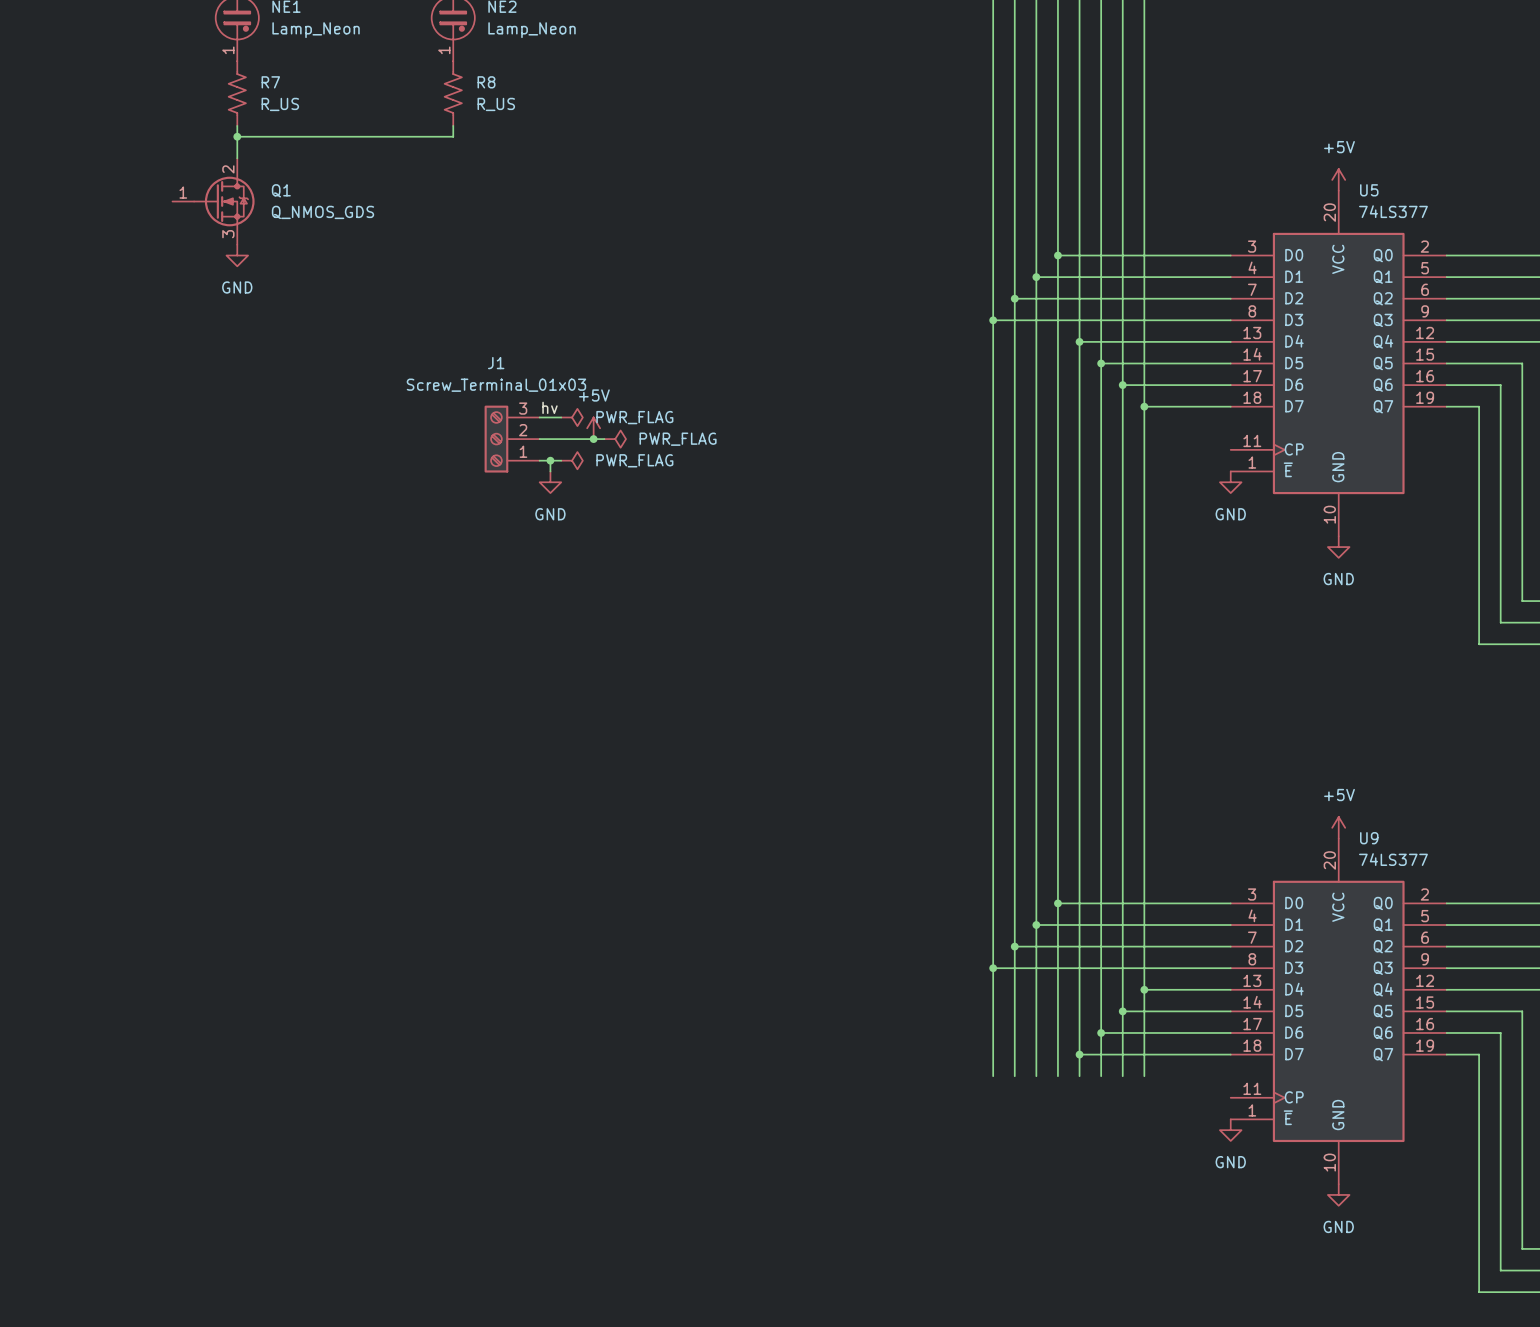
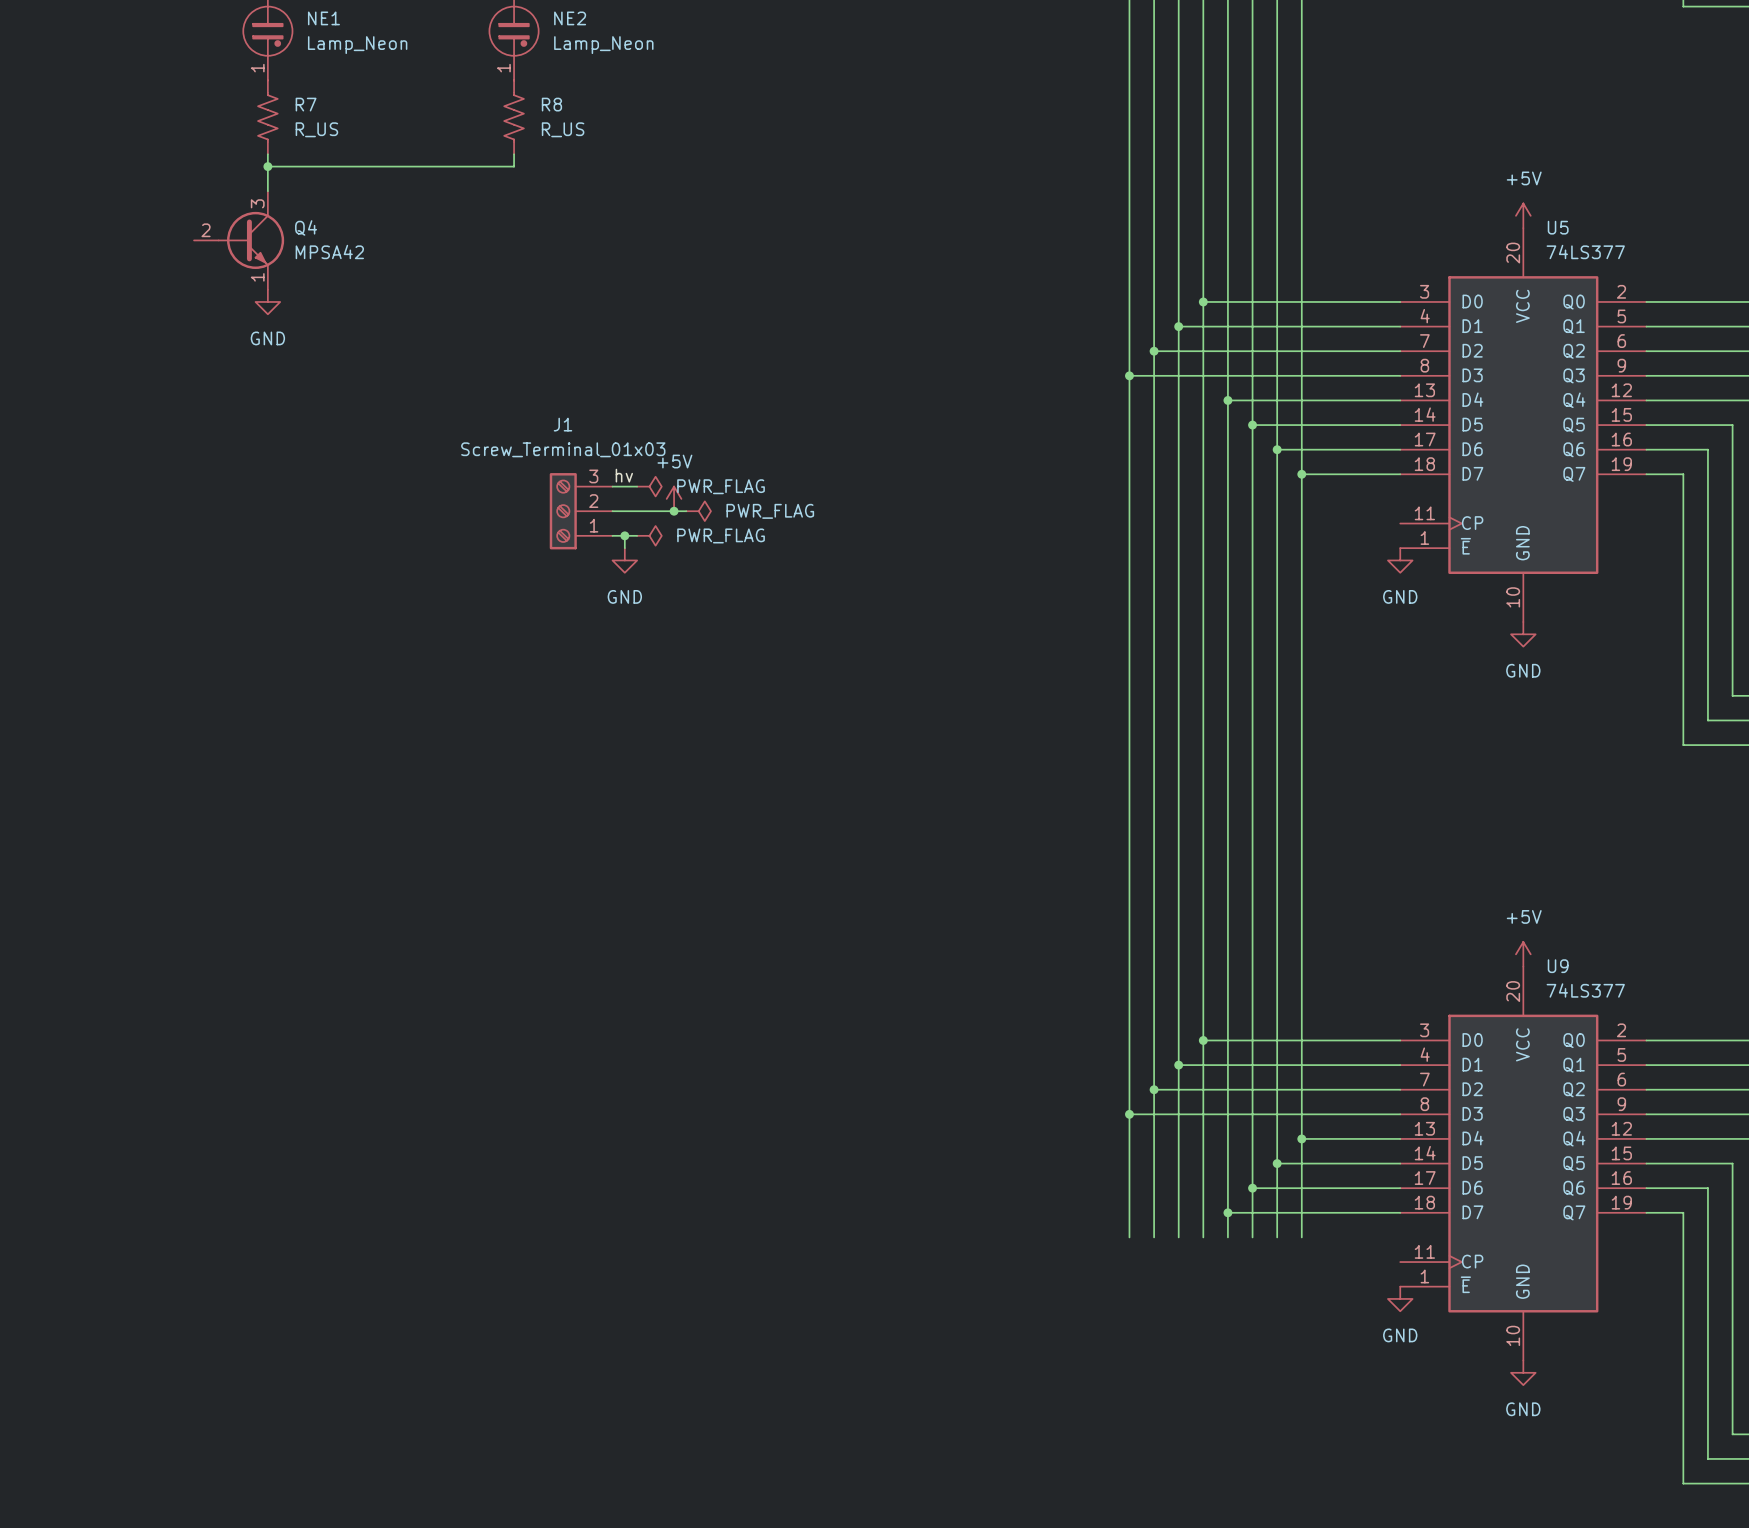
Q4: none -> MPSA42 (239, 240)
Q1: Q_NMOS_GDS (213, 201) -> none

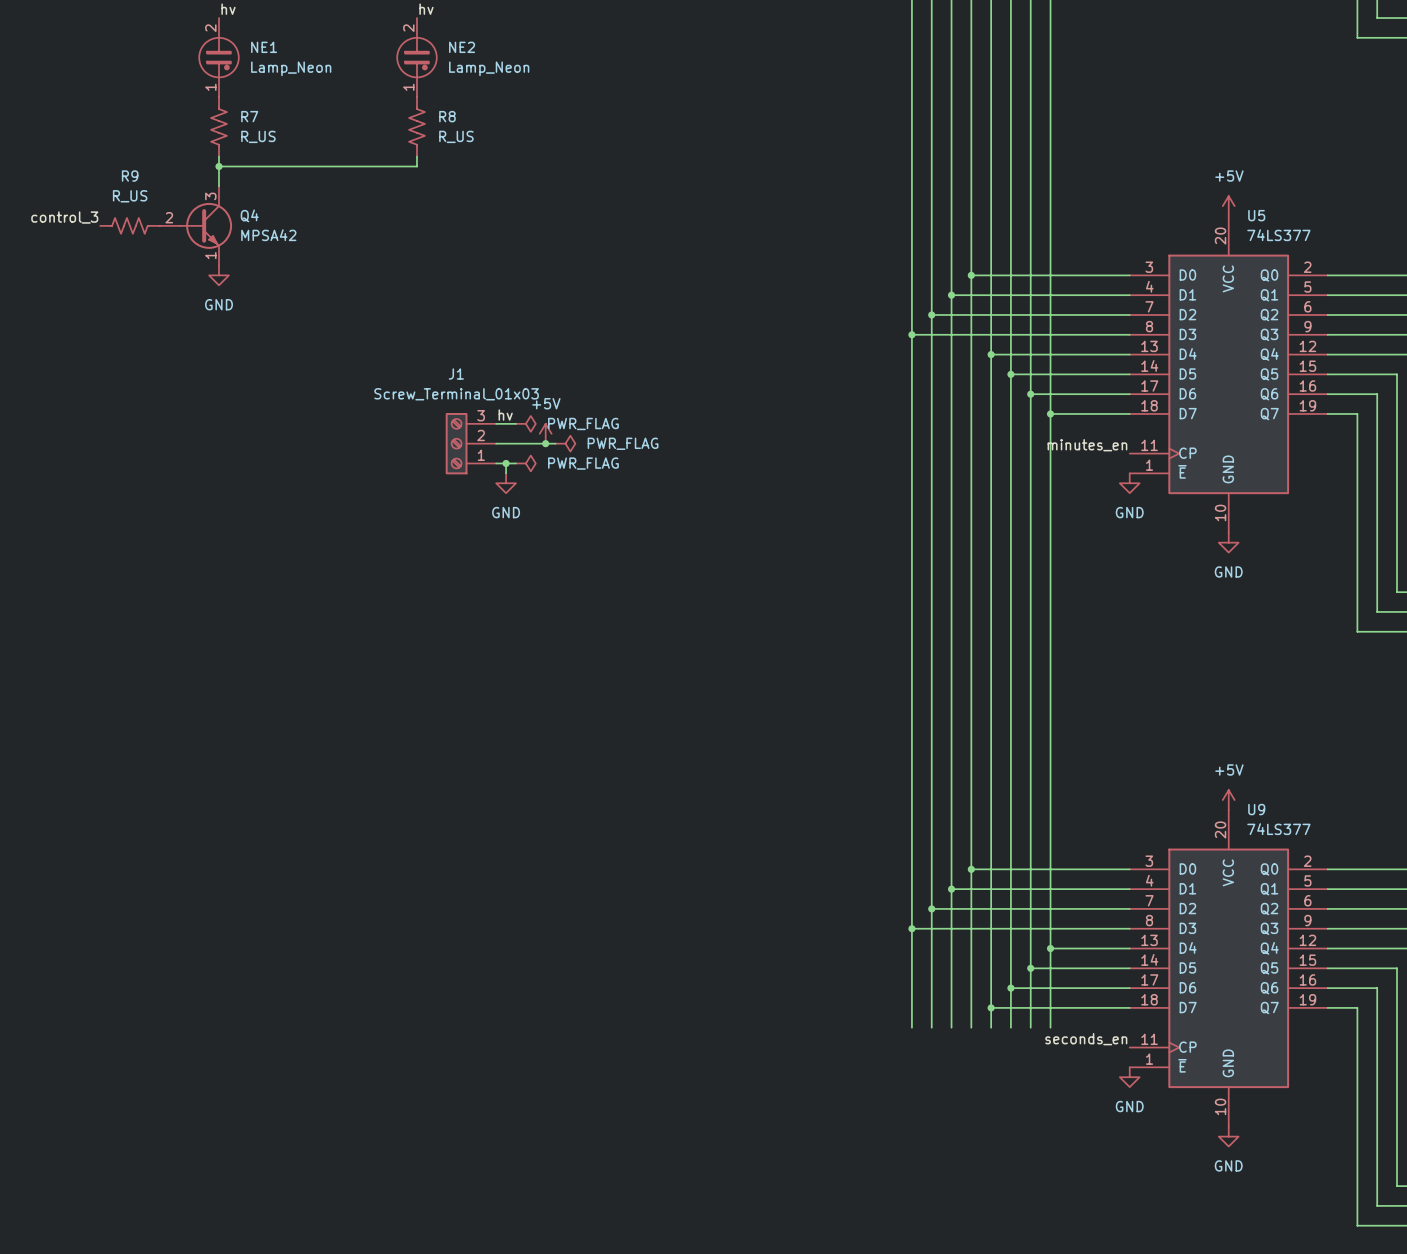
label: none -> control_3 (64, 217)
R9: none -> R_US (129, 225)
label: none -> minutes_en (1087, 445)
label: none -> seconds_en (1086, 1039)

